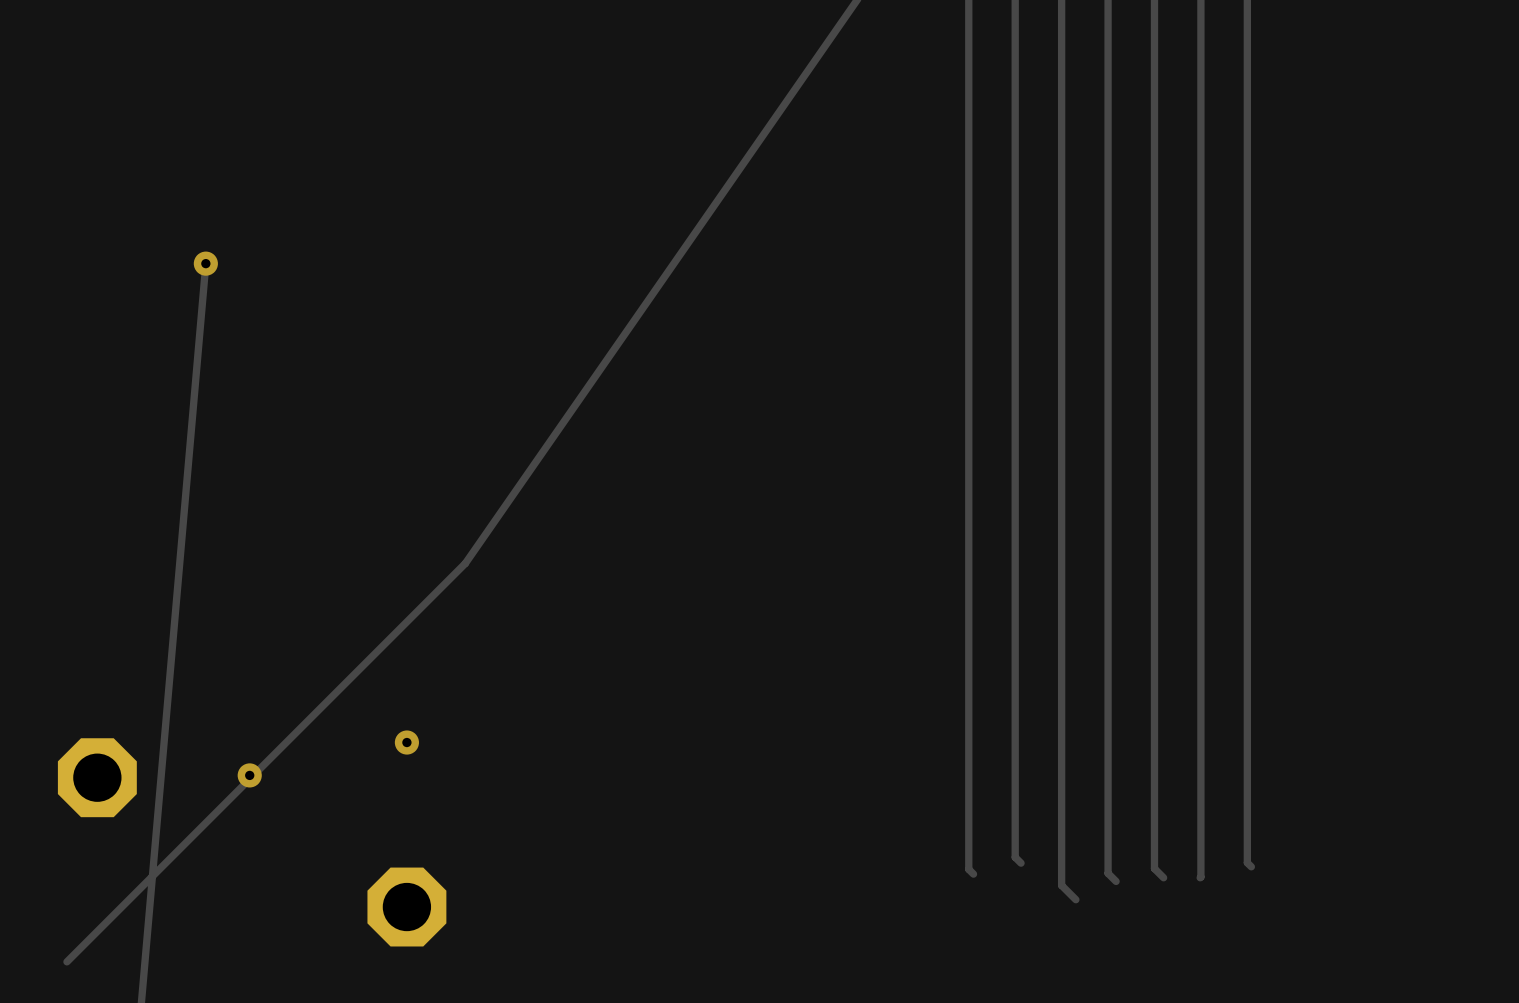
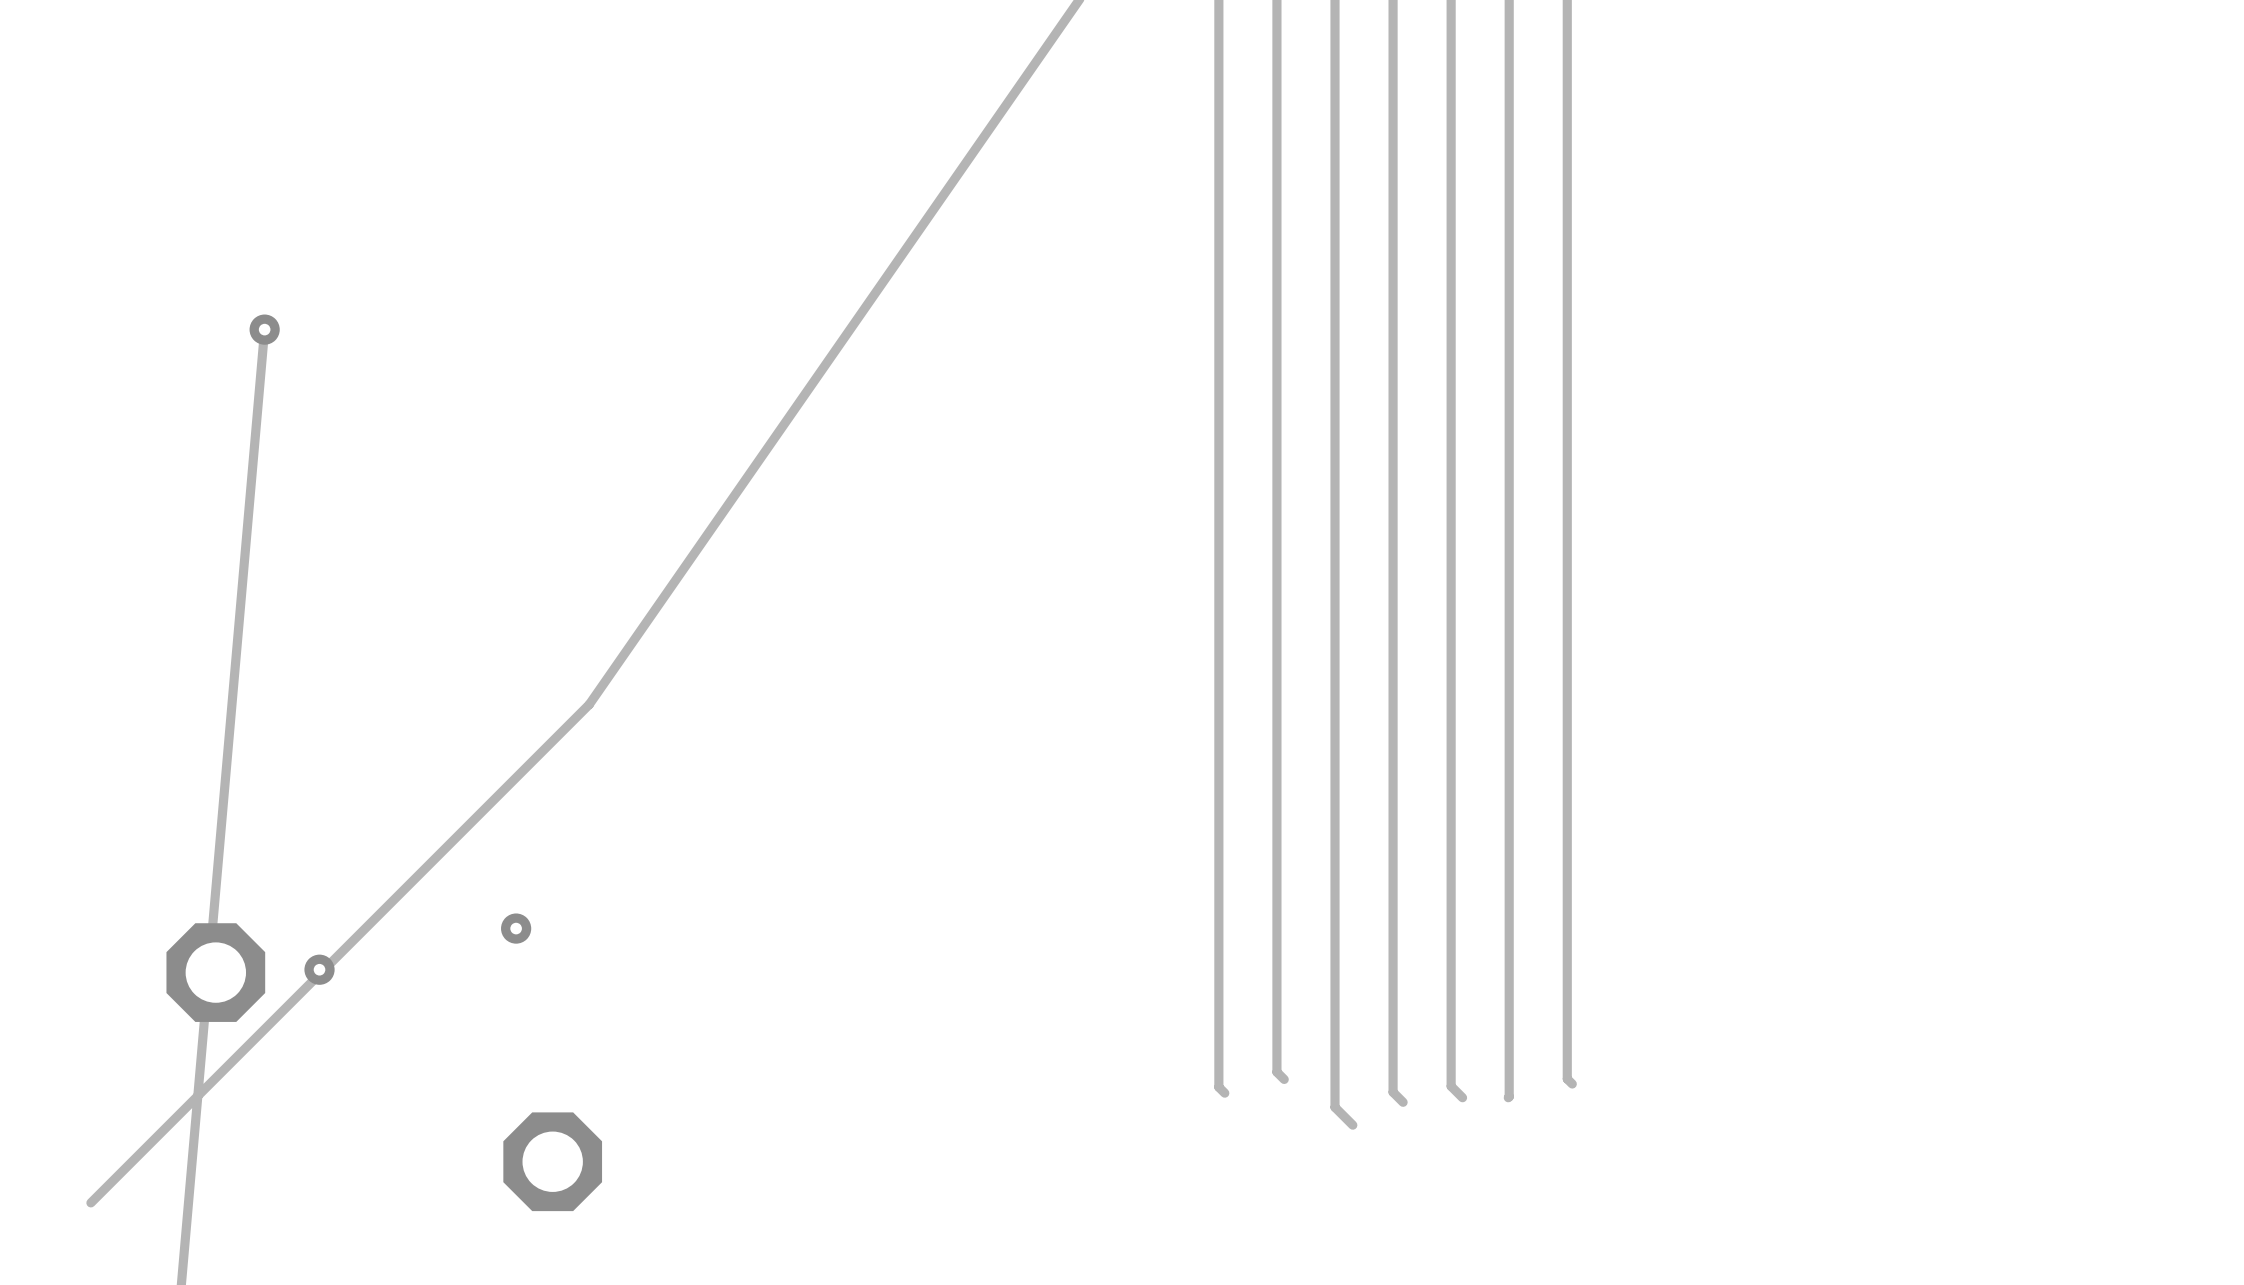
part position: (97, 777) -> (215, 972)
part position: (406, 907) -> (552, 1161)

